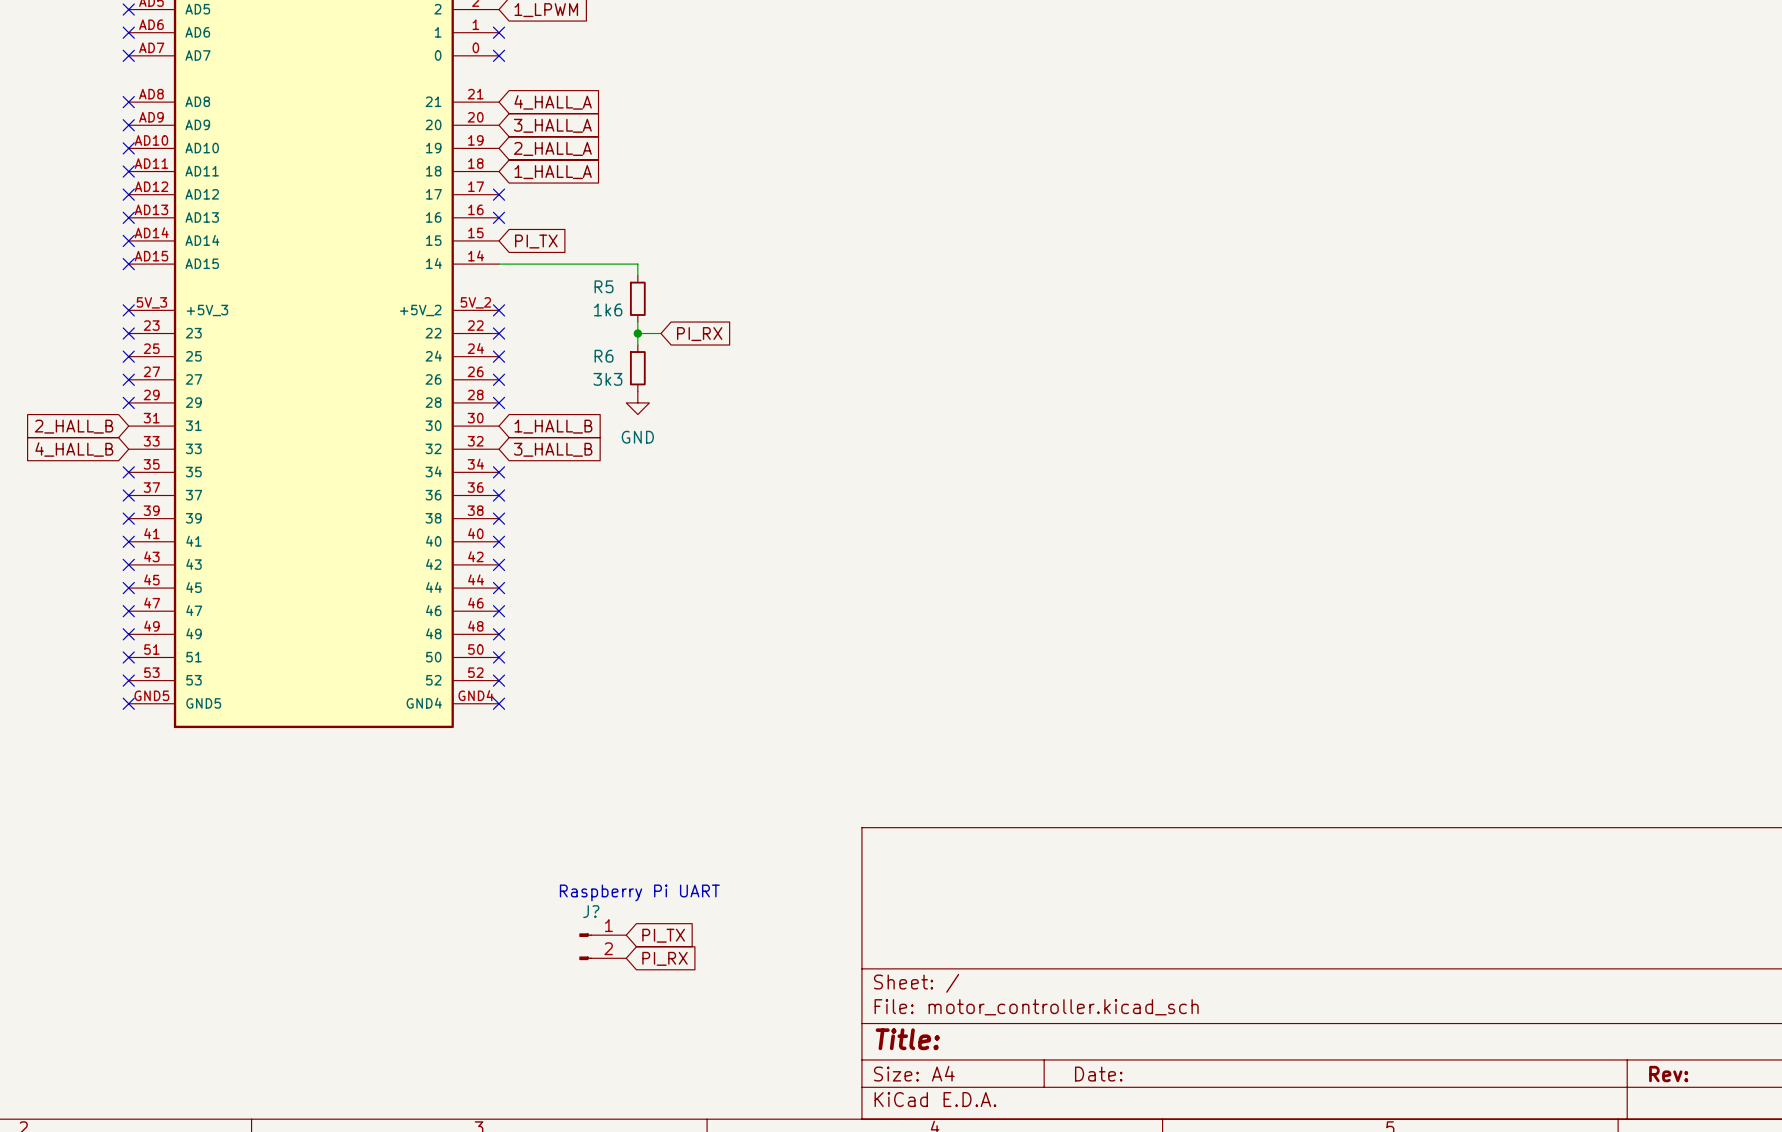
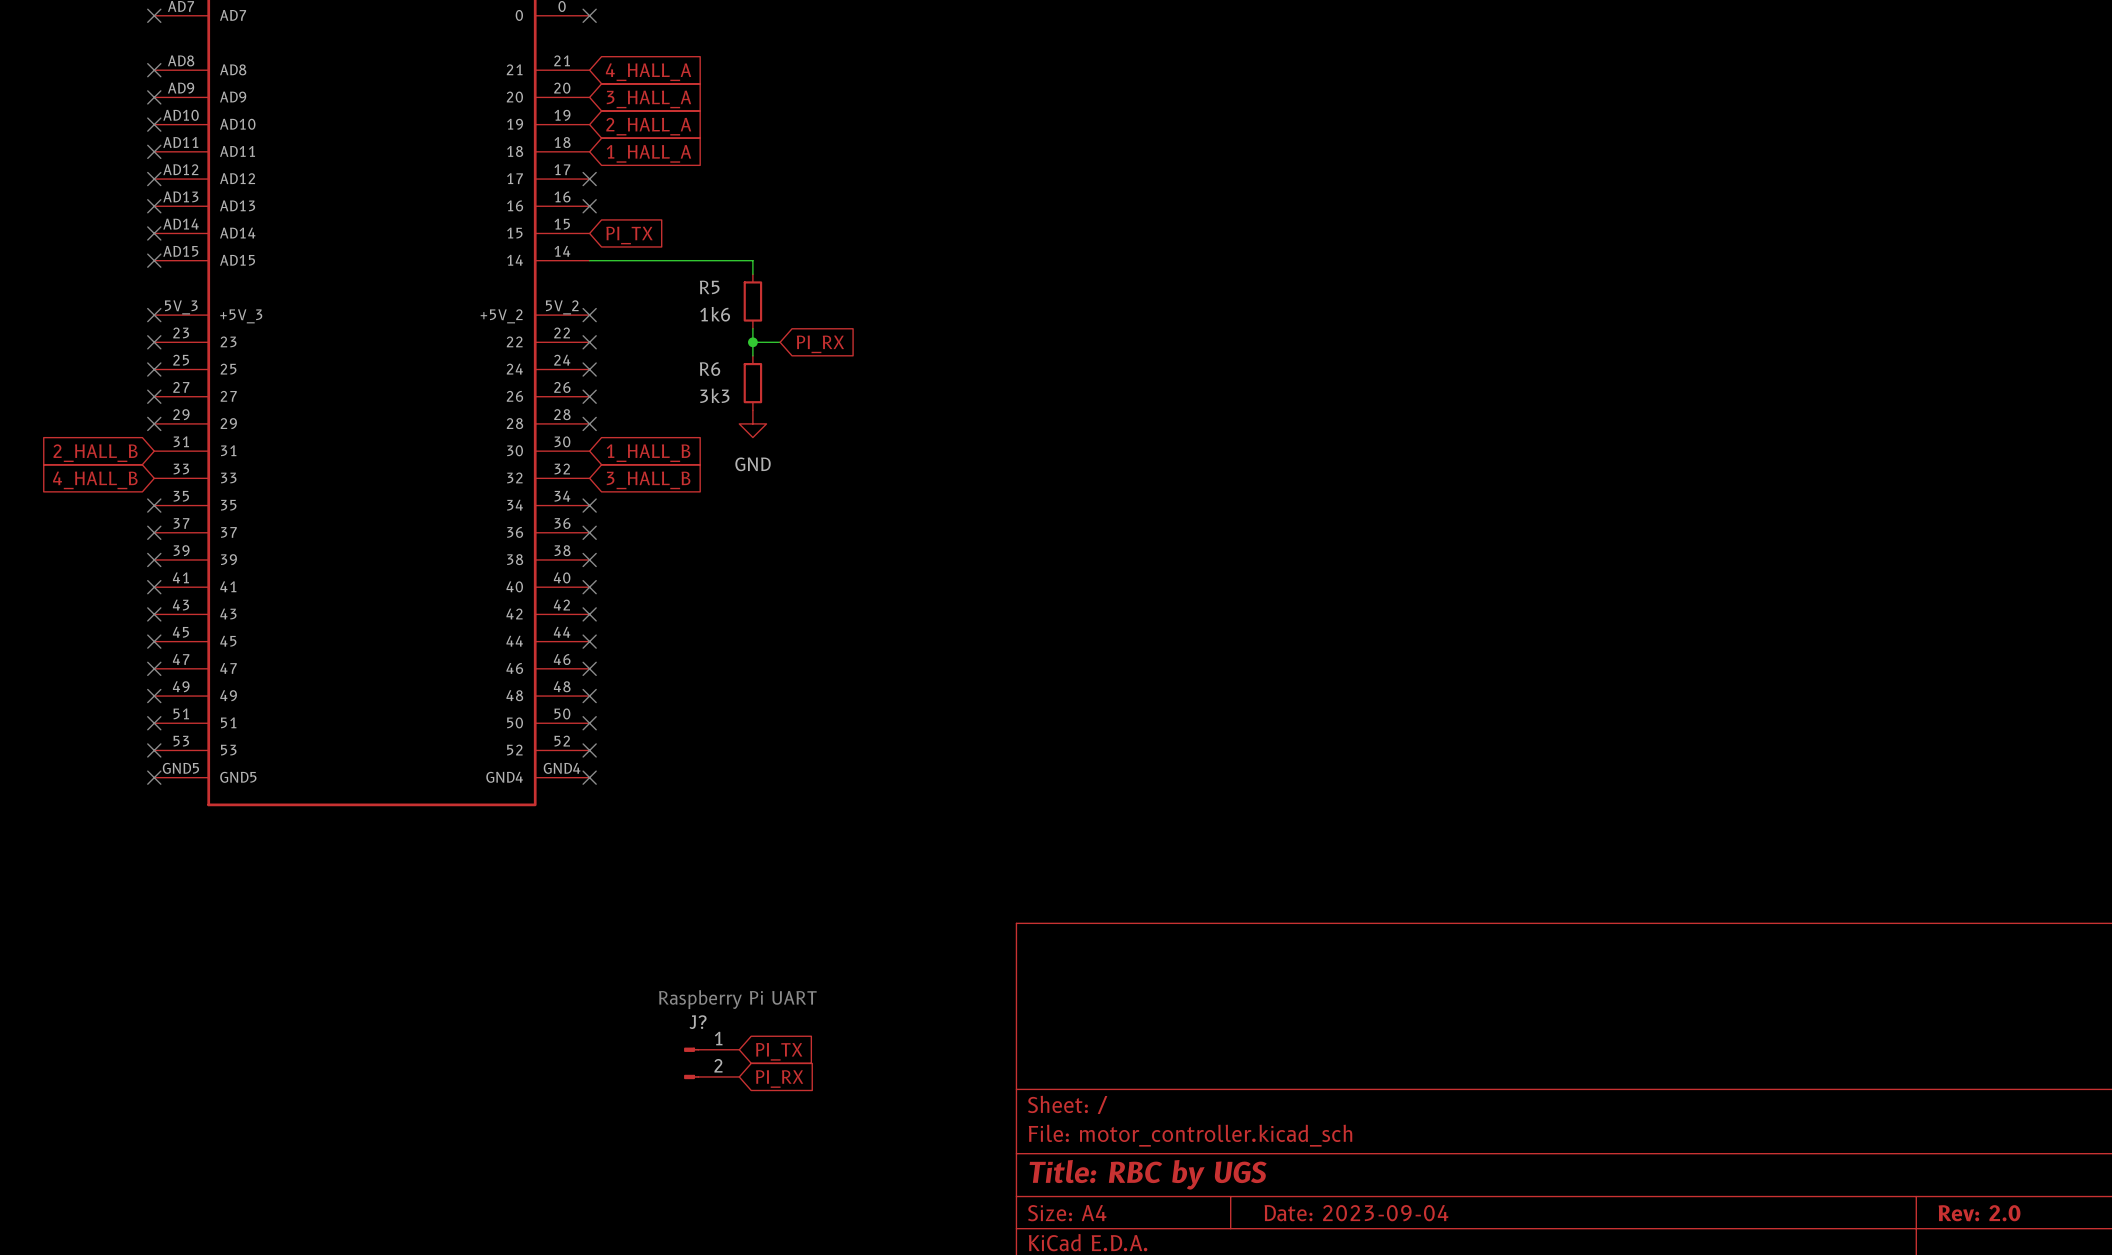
title block: Title: (907, 1039) -> Title: RBC by UGS (1148, 1174)
title block: Date: (1098, 1074) -> Date: 2023-09-04 (1356, 1213)
title block: Rev: (1668, 1074) -> Rev: 2.0 (1979, 1213)

